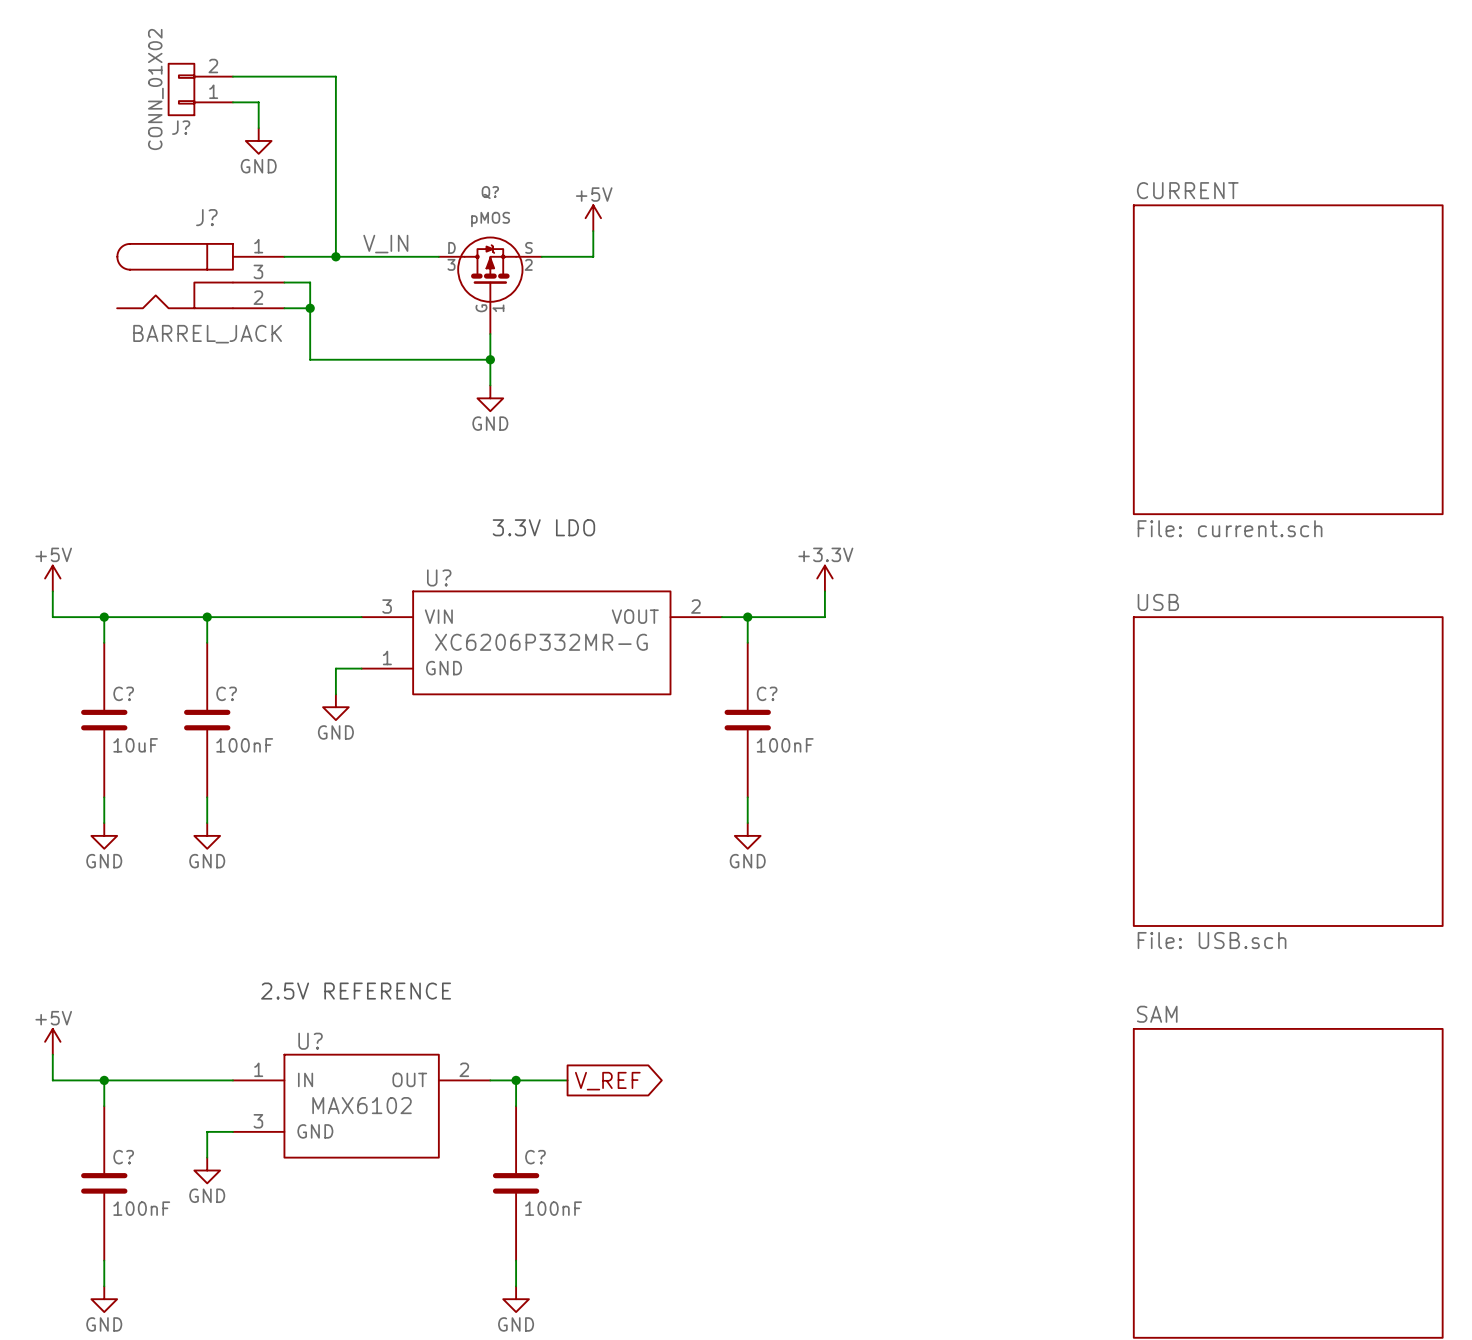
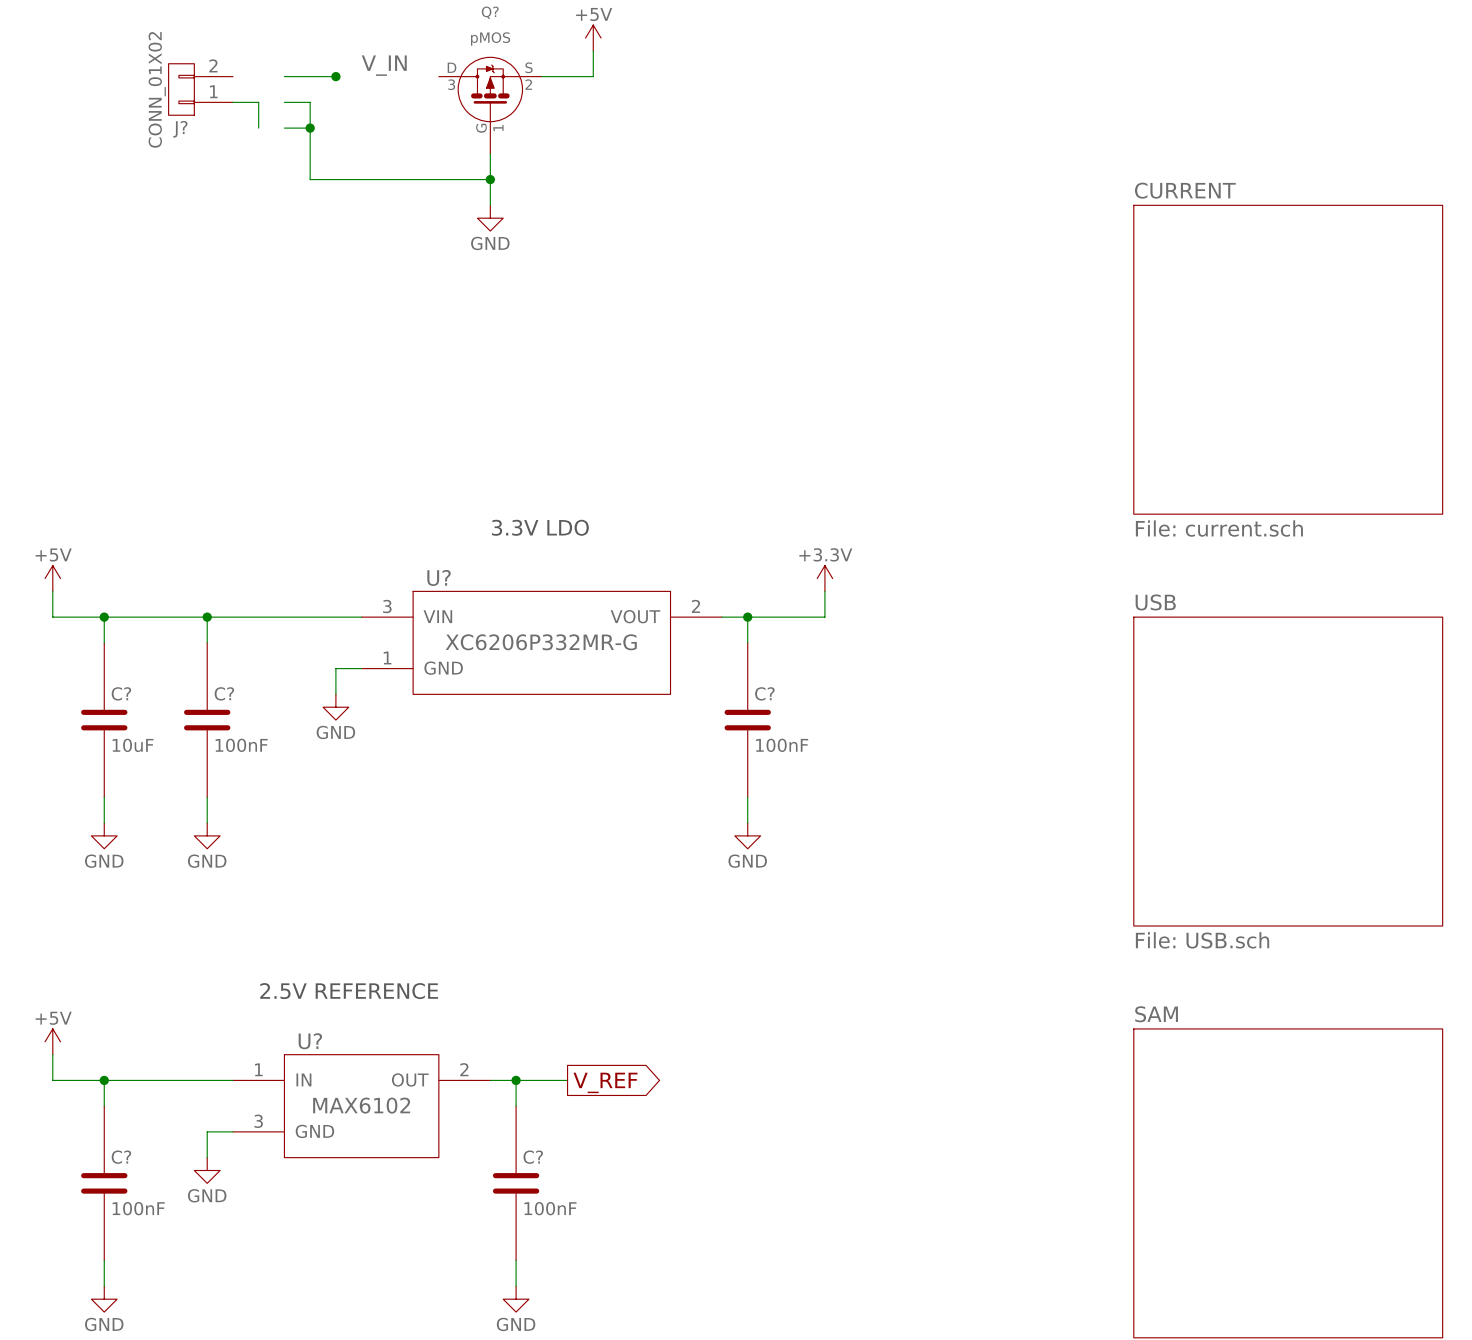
wire: (232, 76) (284, 76) -> none
wire: (335, 76) (335, 256) -> none
junction: none -> (335, 76)
junction: none -> (310, 128)
power symbol: GND (258, 140) -> none
junction: none -> (490, 179)
power symbol: none -> GND (490, 218)
power symbol position: +5V (593, 218) -> +5V (593, 38)
wire: (593, 231) (593, 256) (541, 256) -> (593, 50) (593, 76) (541, 76)
label position: V_IN (385, 244) -> V_IN (384, 65)
wire: (284, 256) (438, 256) -> none
junction: (335, 256) -> none
J?: BARREL_JACK (200, 276) -> none
wire: (284, 282) (310, 282) (310, 359) (490, 359) -> (284, 102) (310, 102) (310, 179) (490, 179)
Q? position: (490, 285) -> (490, 105)
wire: (284, 308) (310, 308) -> (284, 128) (310, 128)
junction: (310, 308) -> none
wire: (490, 334) (490, 385) -> (490, 153) (490, 205)
junction: (490, 359) -> none
power symbol: GND (490, 398) -> none

